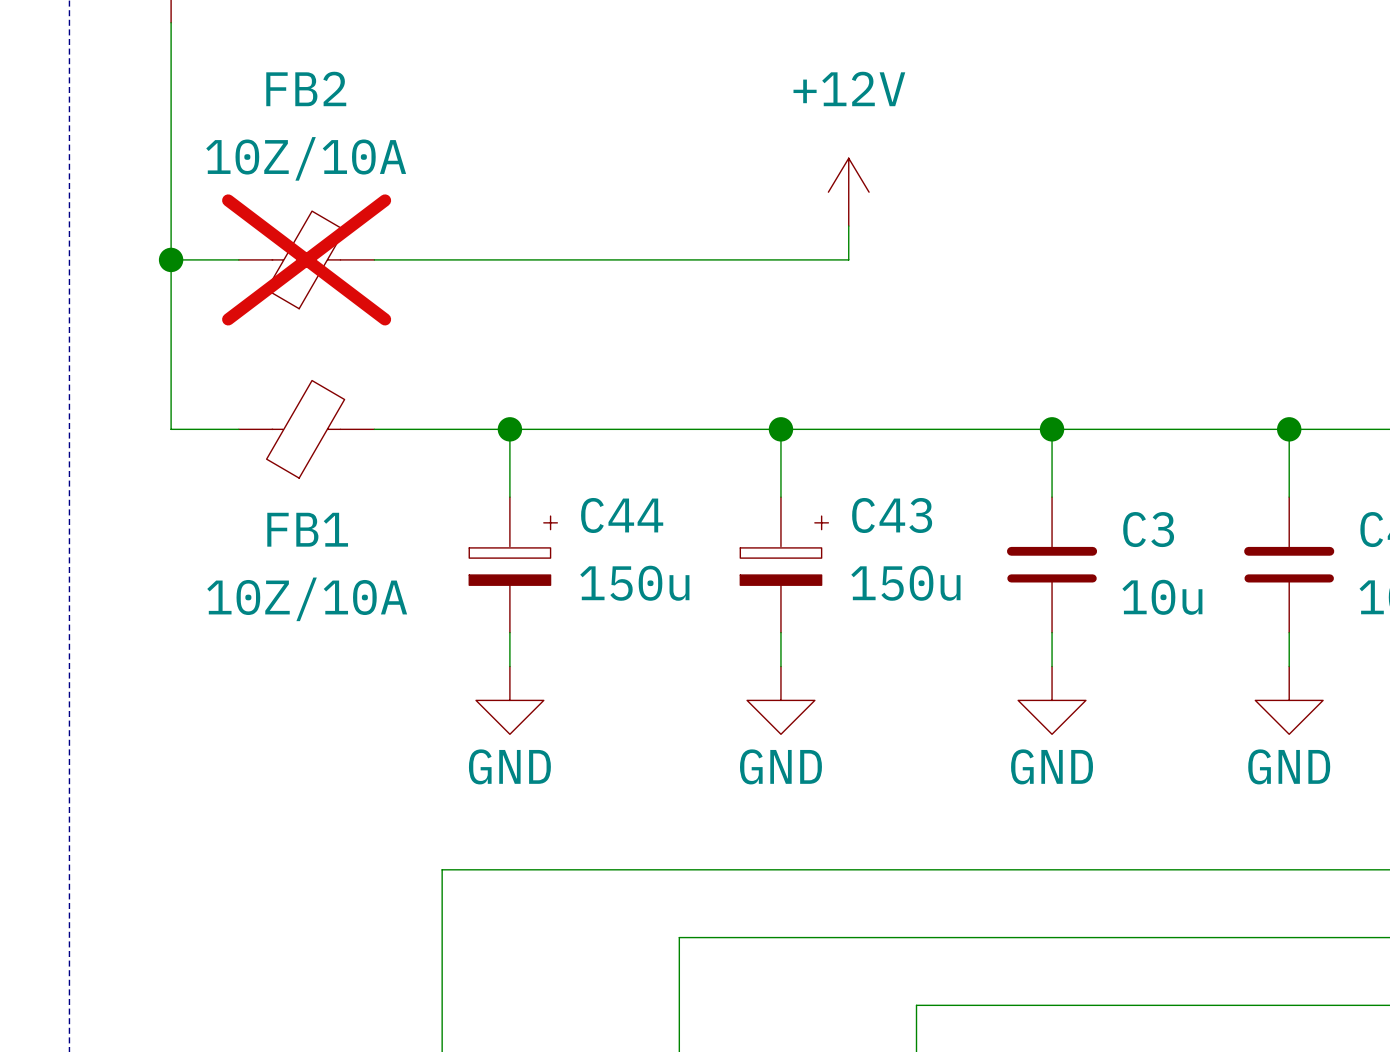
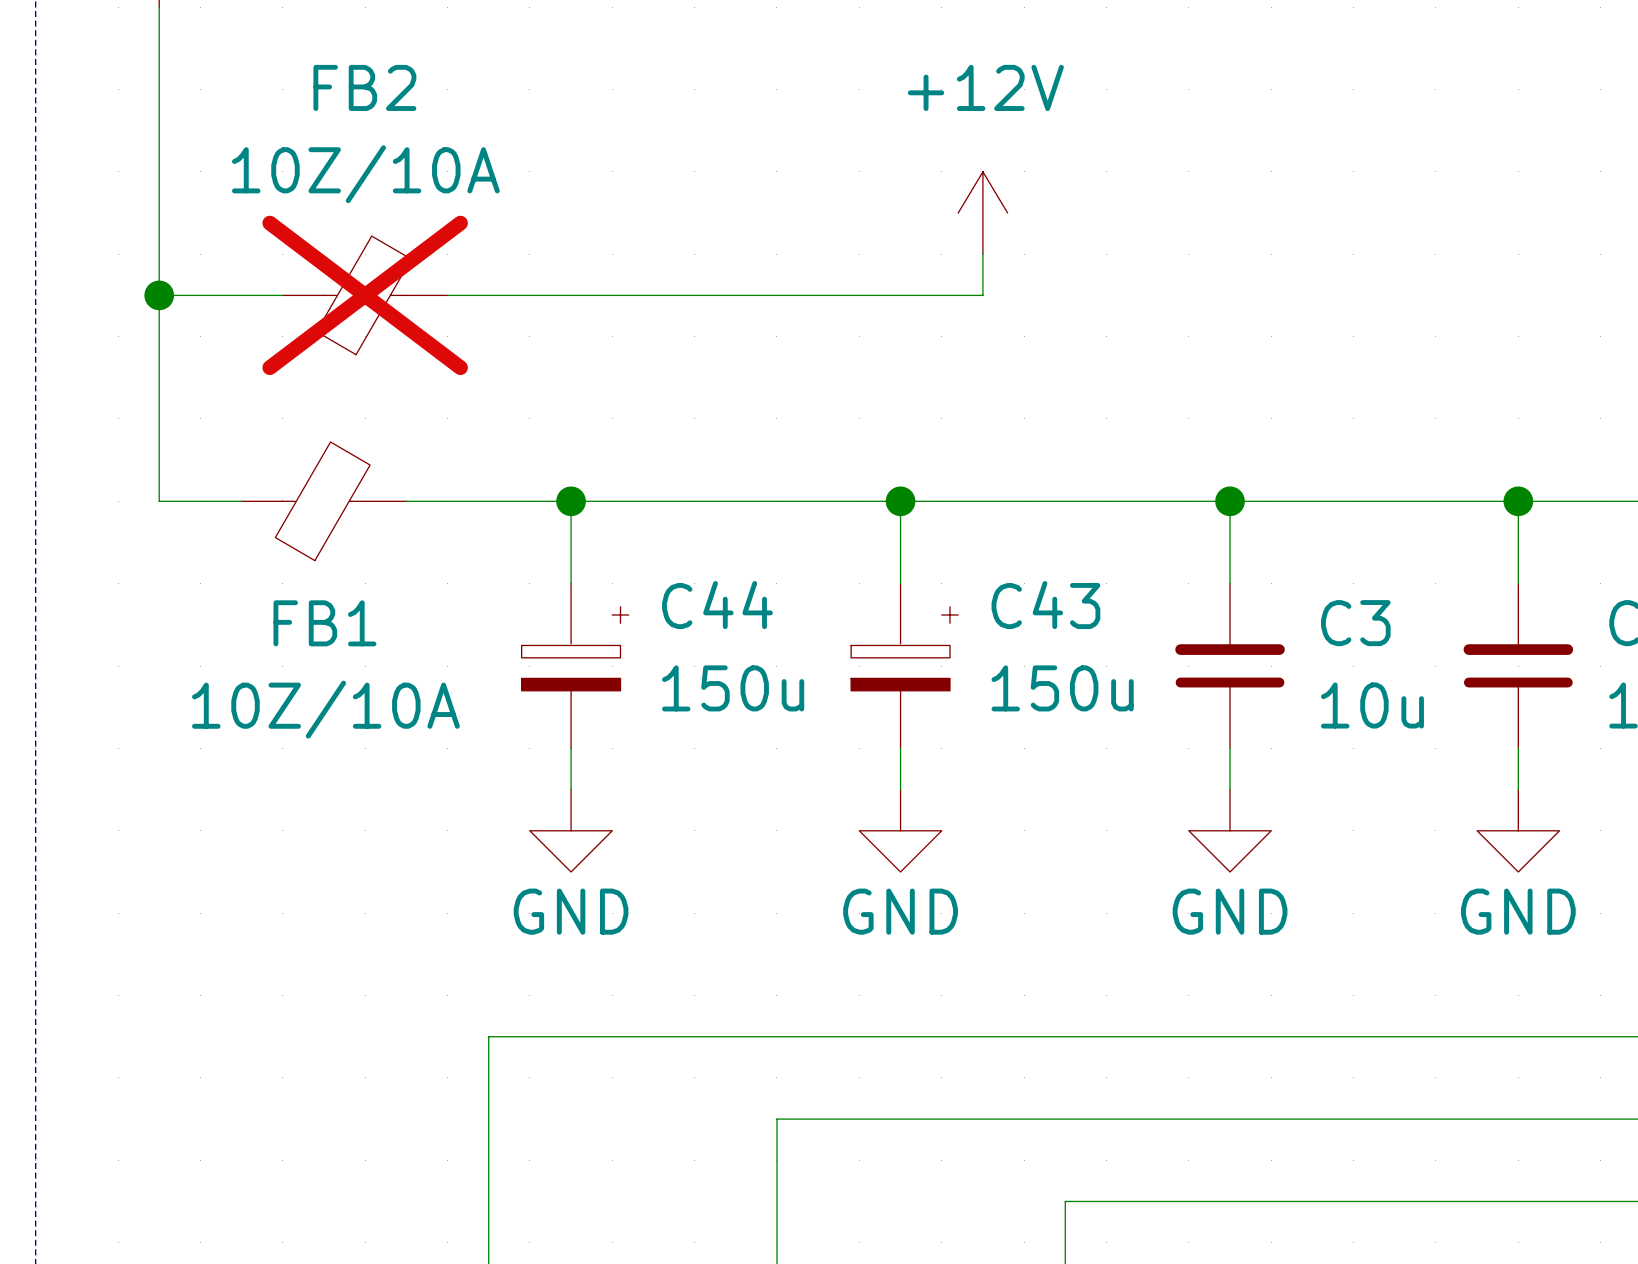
FB2 position: (306, 259) -> (365, 295)

